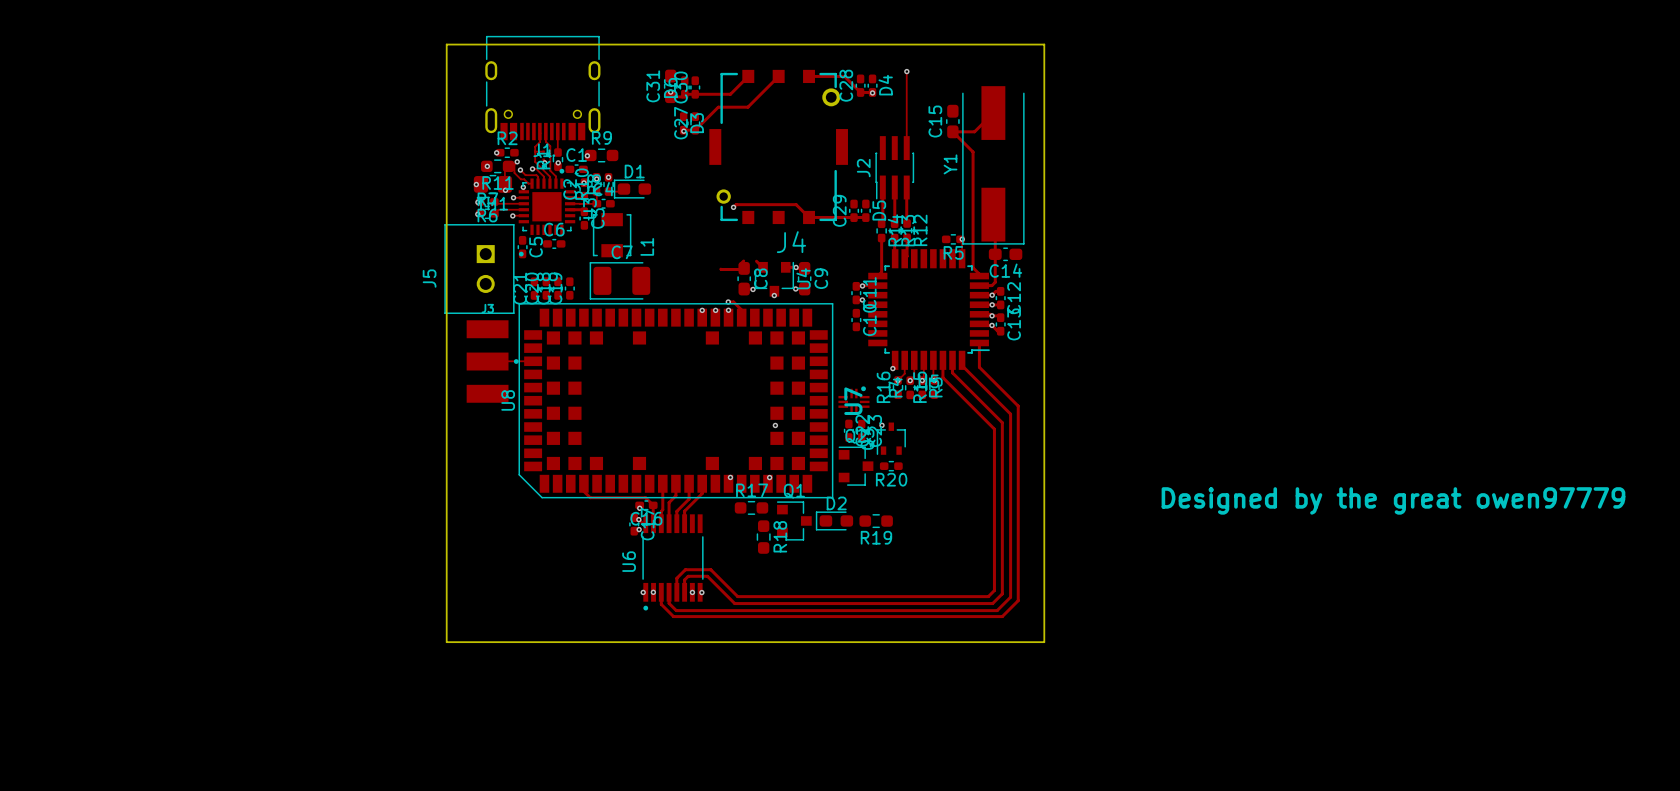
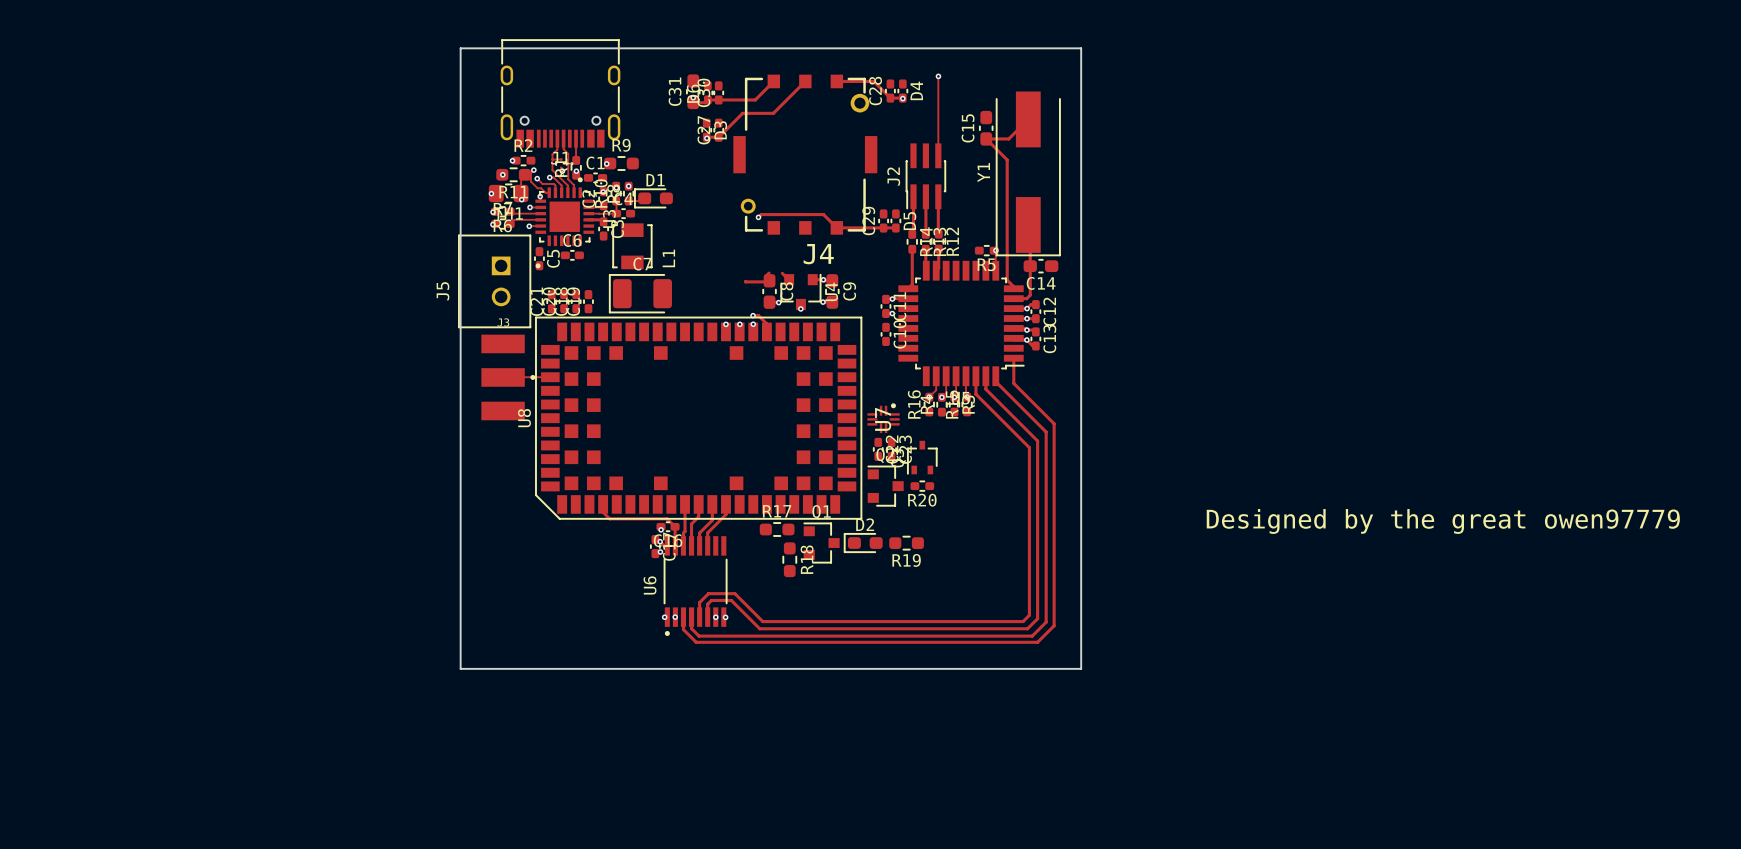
via: (892, 368) -> none
via: (775, 425) -> none
via: (881, 425) -> none
via: (730, 477) -> none
via: (769, 477) -> none

